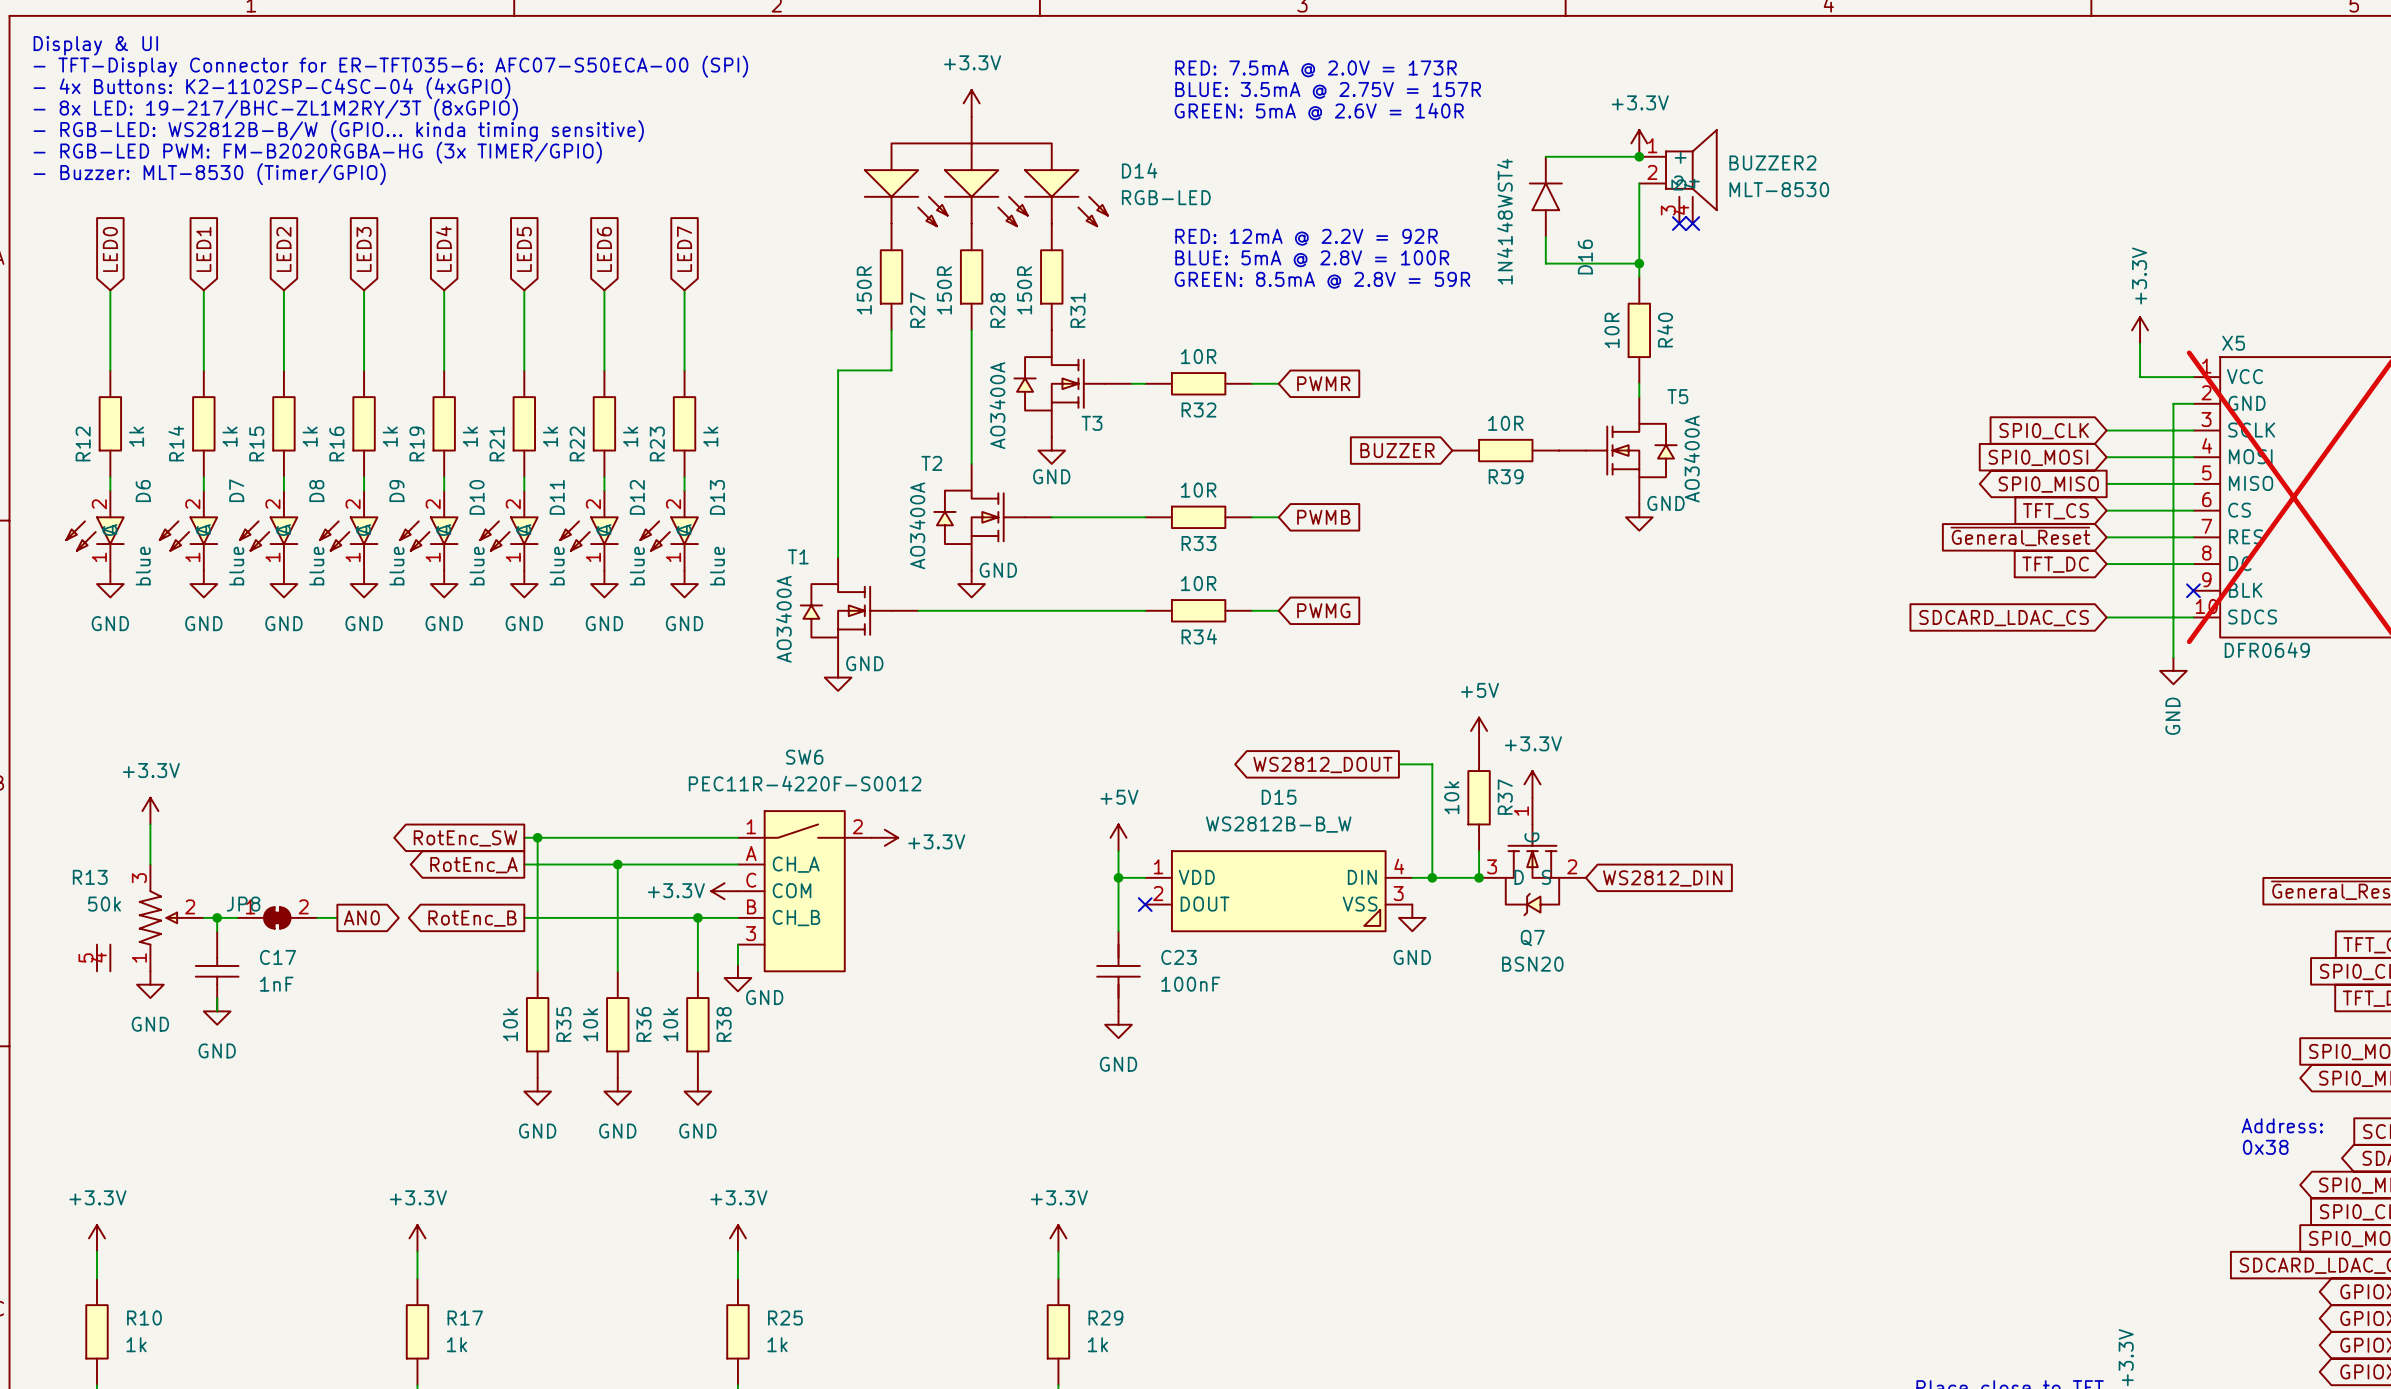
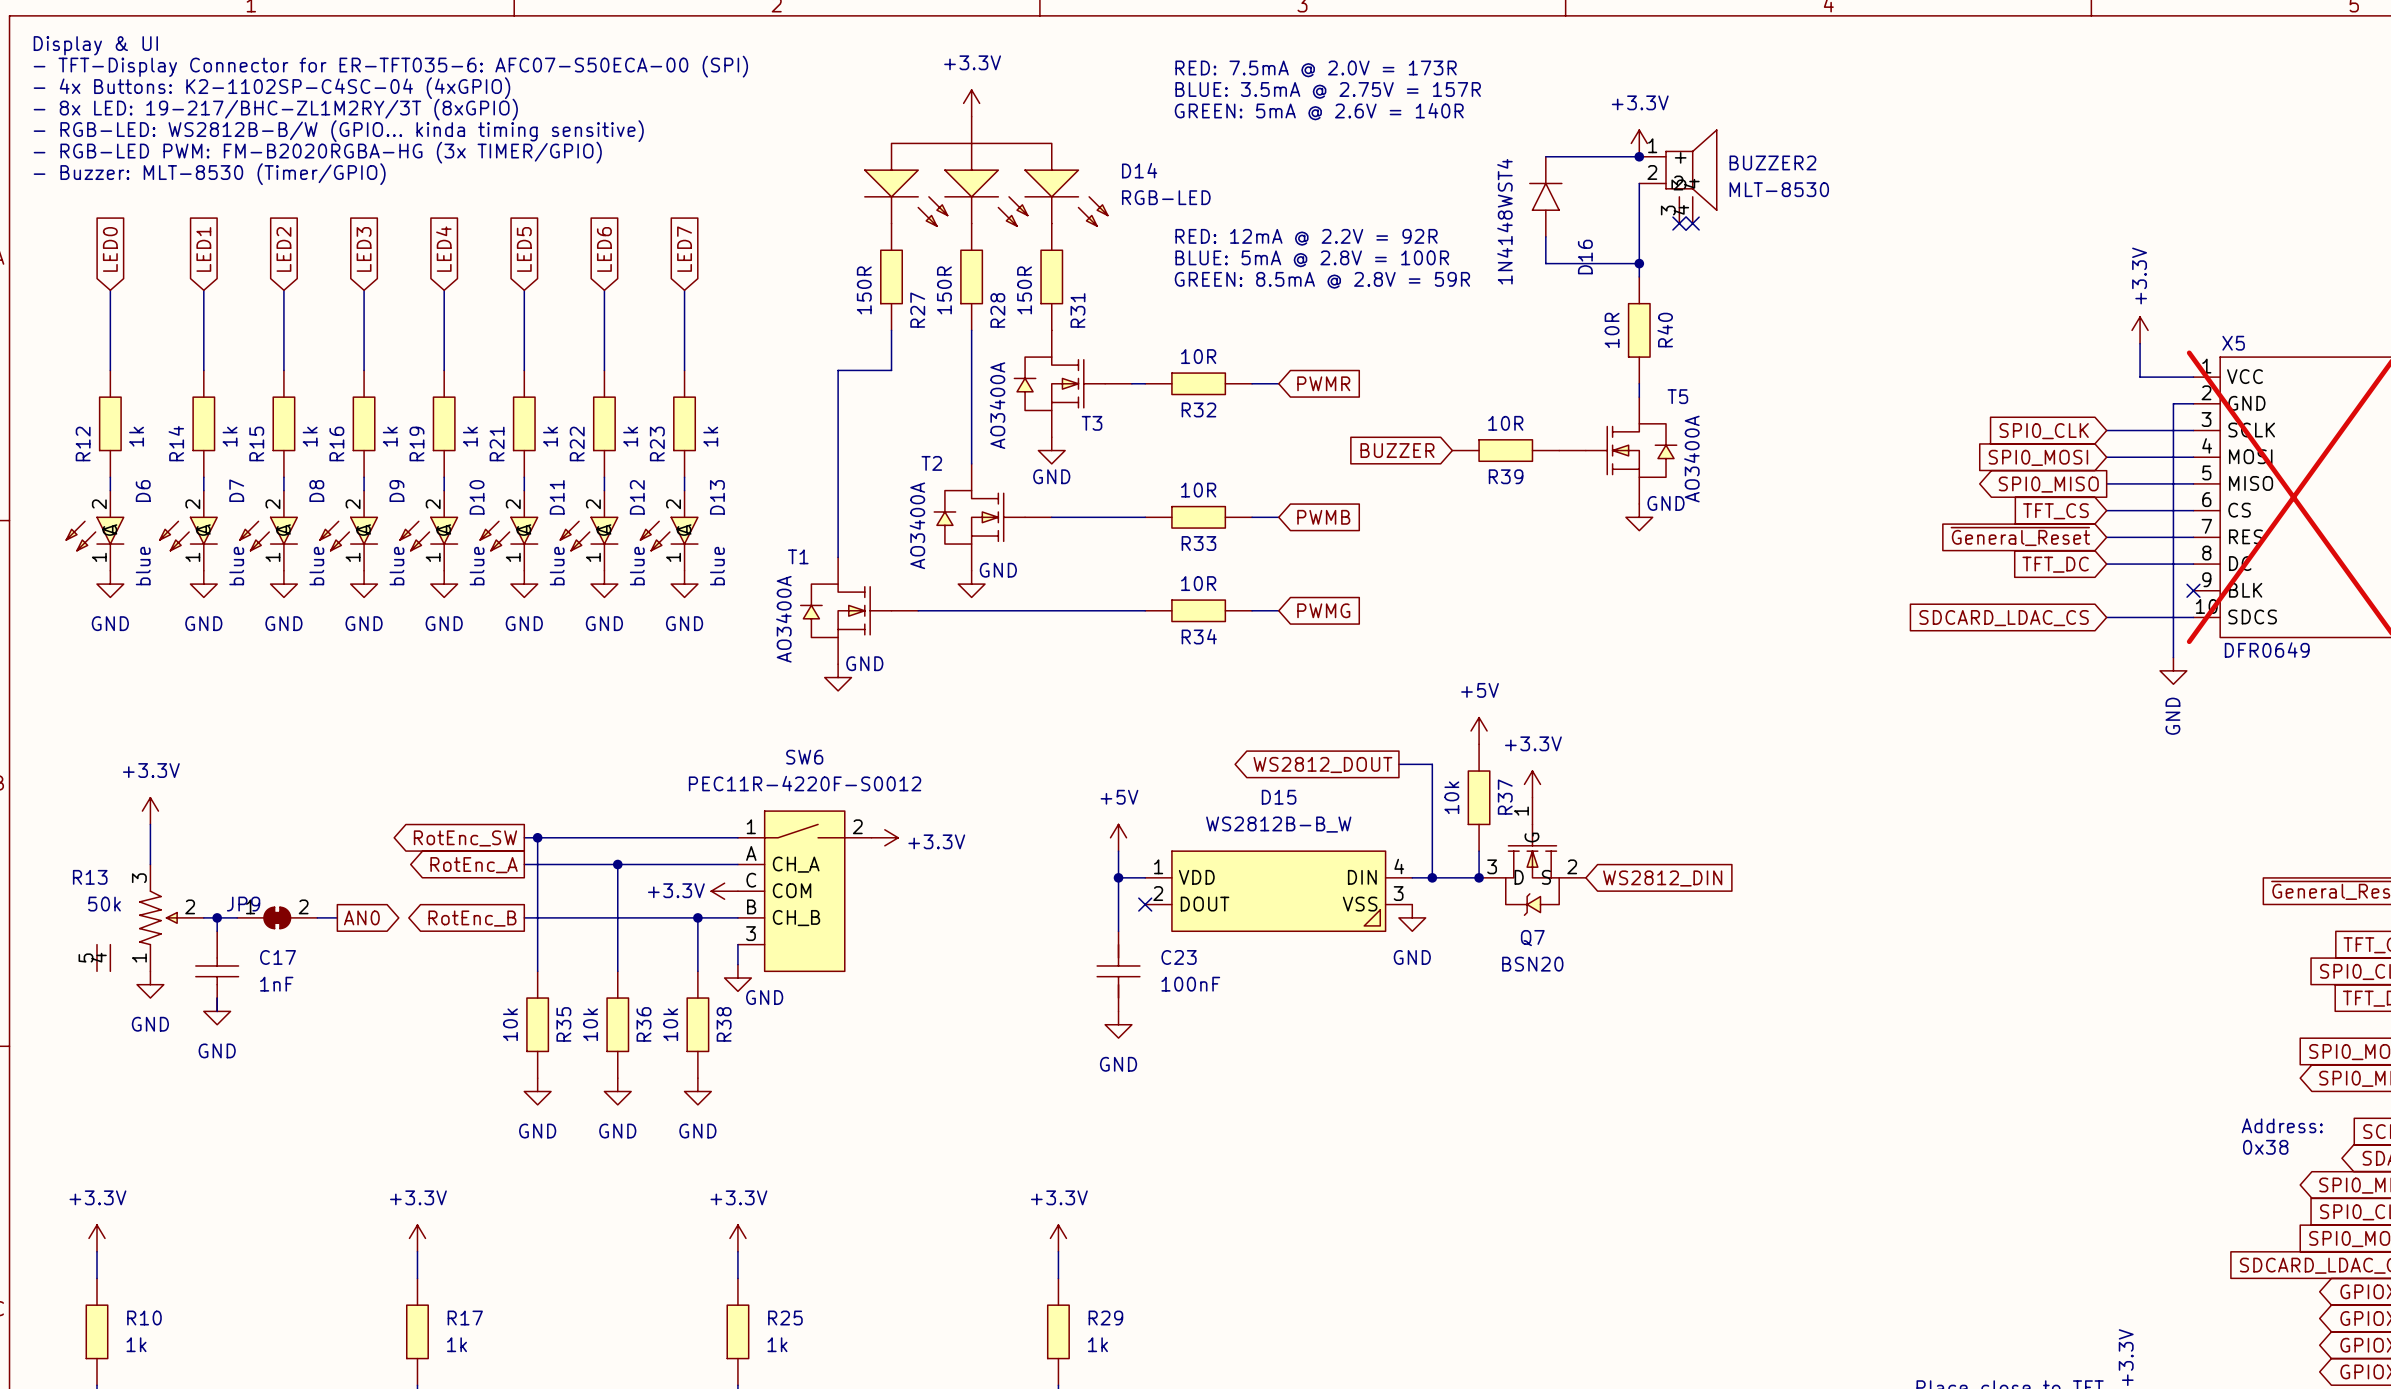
JP8 name: JP8 (243, 904) -> JP9 (243, 904)

